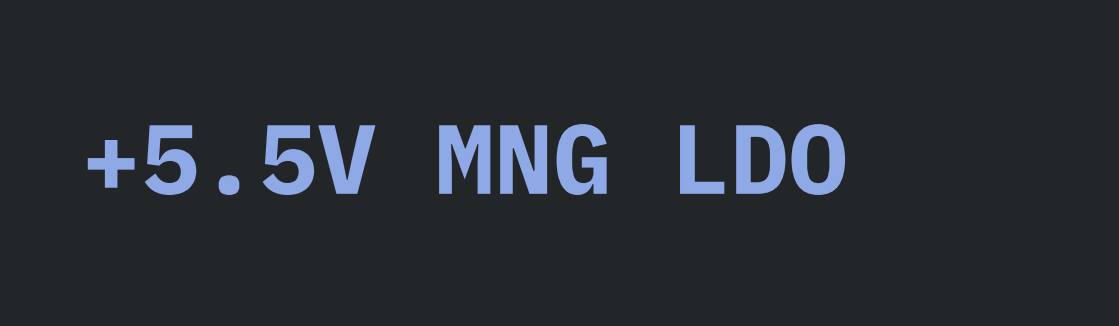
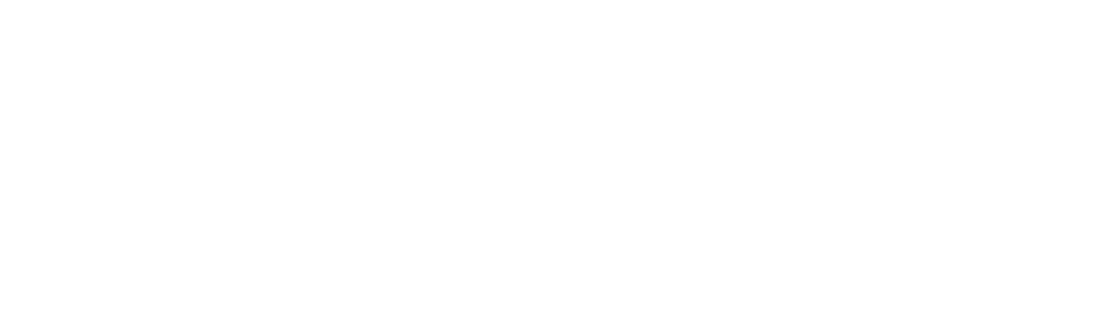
text: +5.5V MNG LDO (466, 159) -> none

